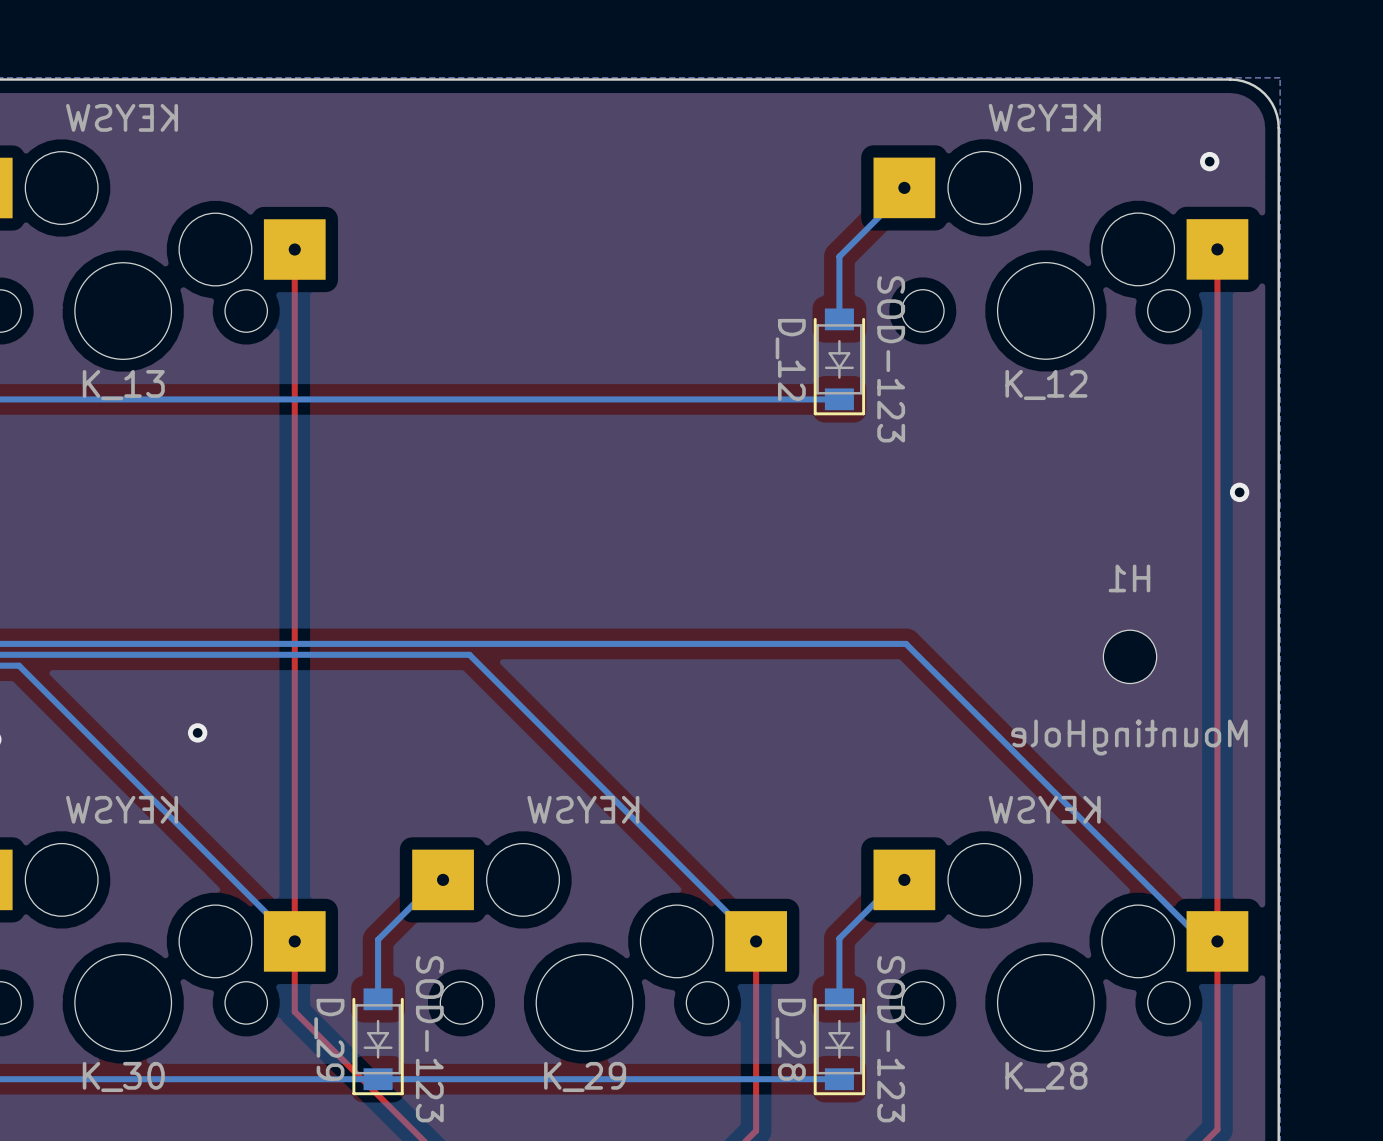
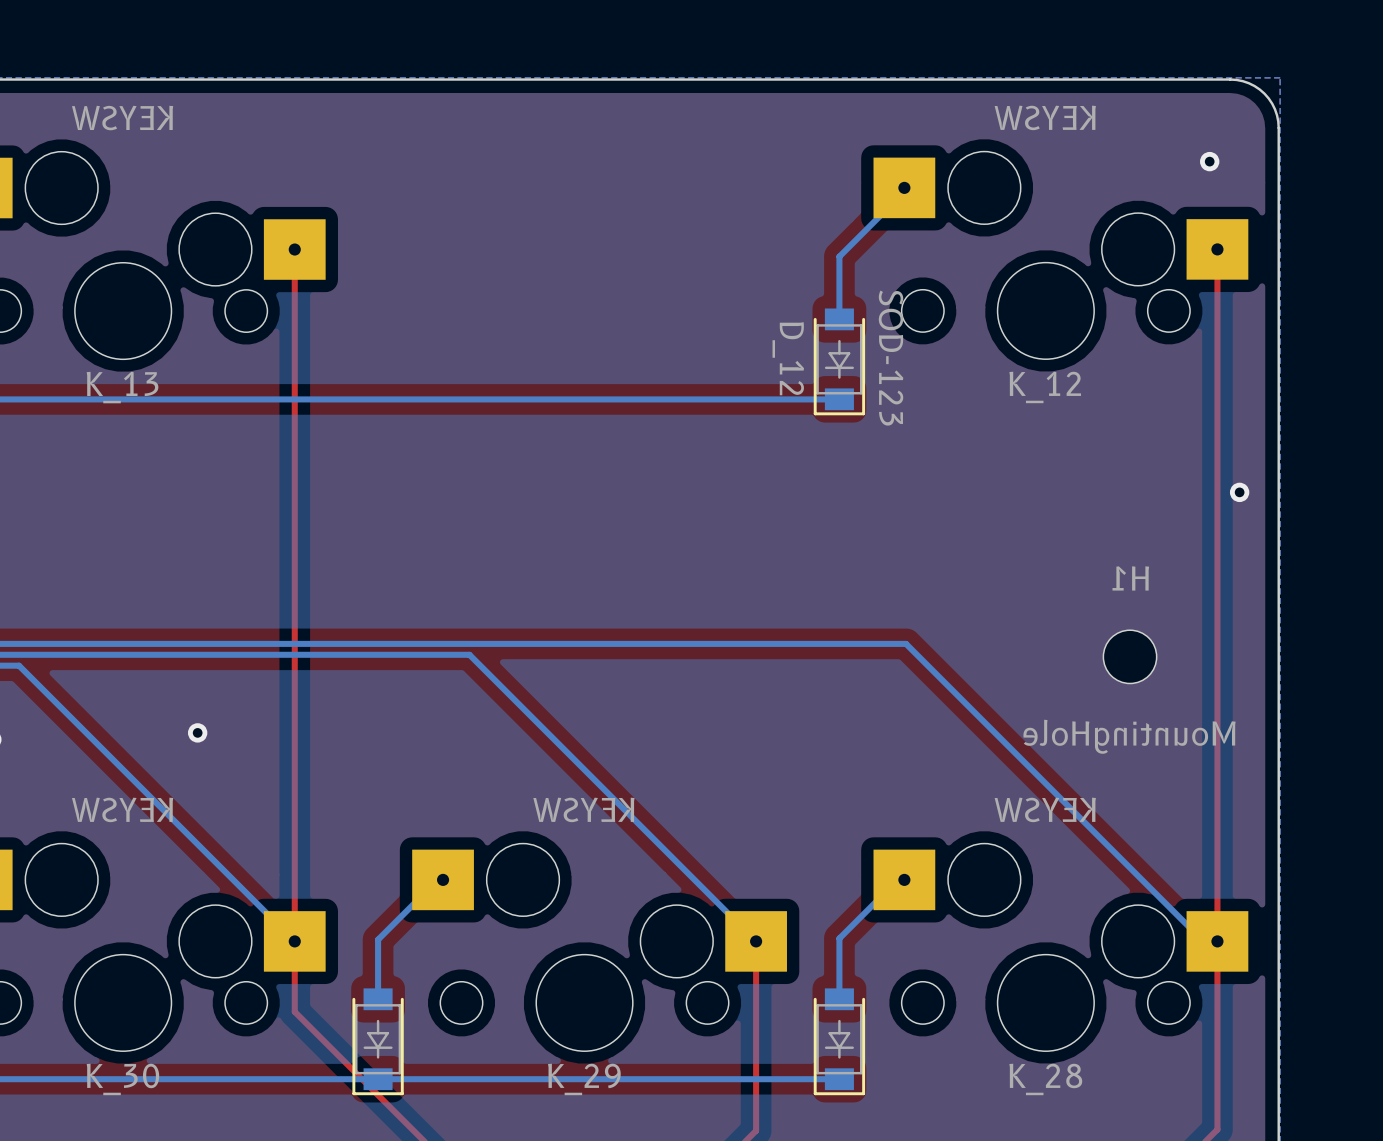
D_29 name: D_29 (329, 1039) -> none
D_29 value: SOD-123 (429, 1039) -> none
D_28 name: D_28 (790, 1039) -> none
D_28 value: SOD-123 (891, 1039) -> none

